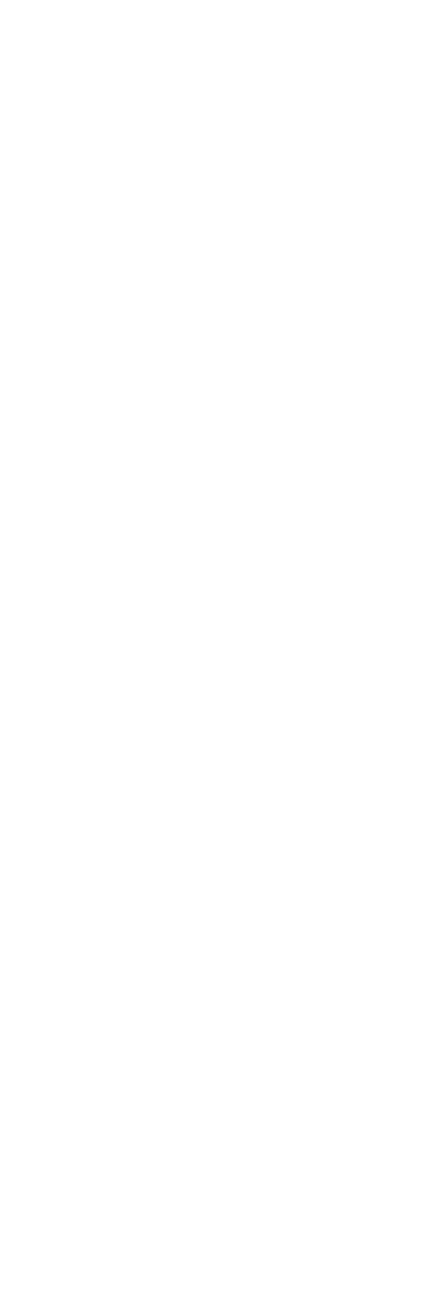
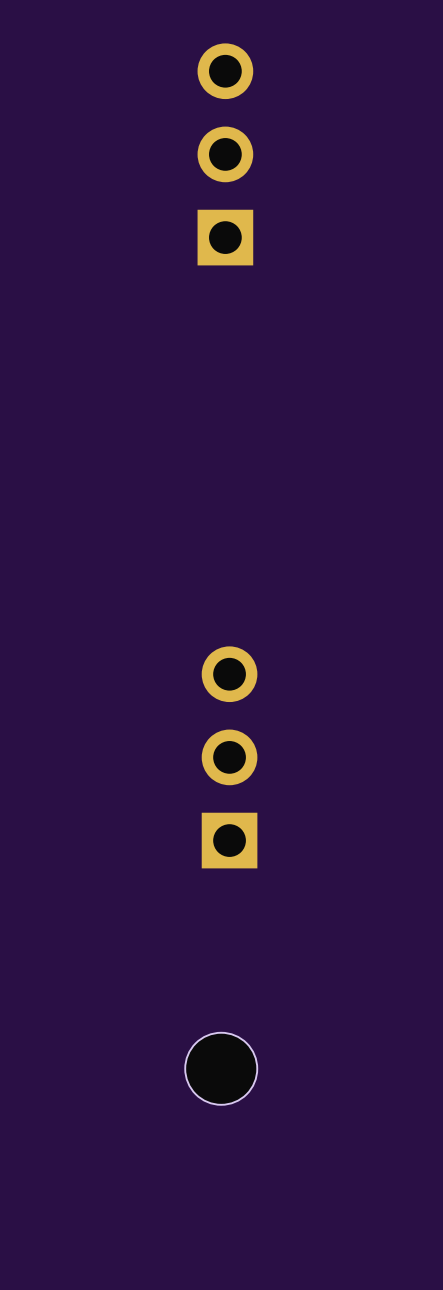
part: none -> (225, 154)
part: none -> (229, 757)
part: none -> (221, 1068)

